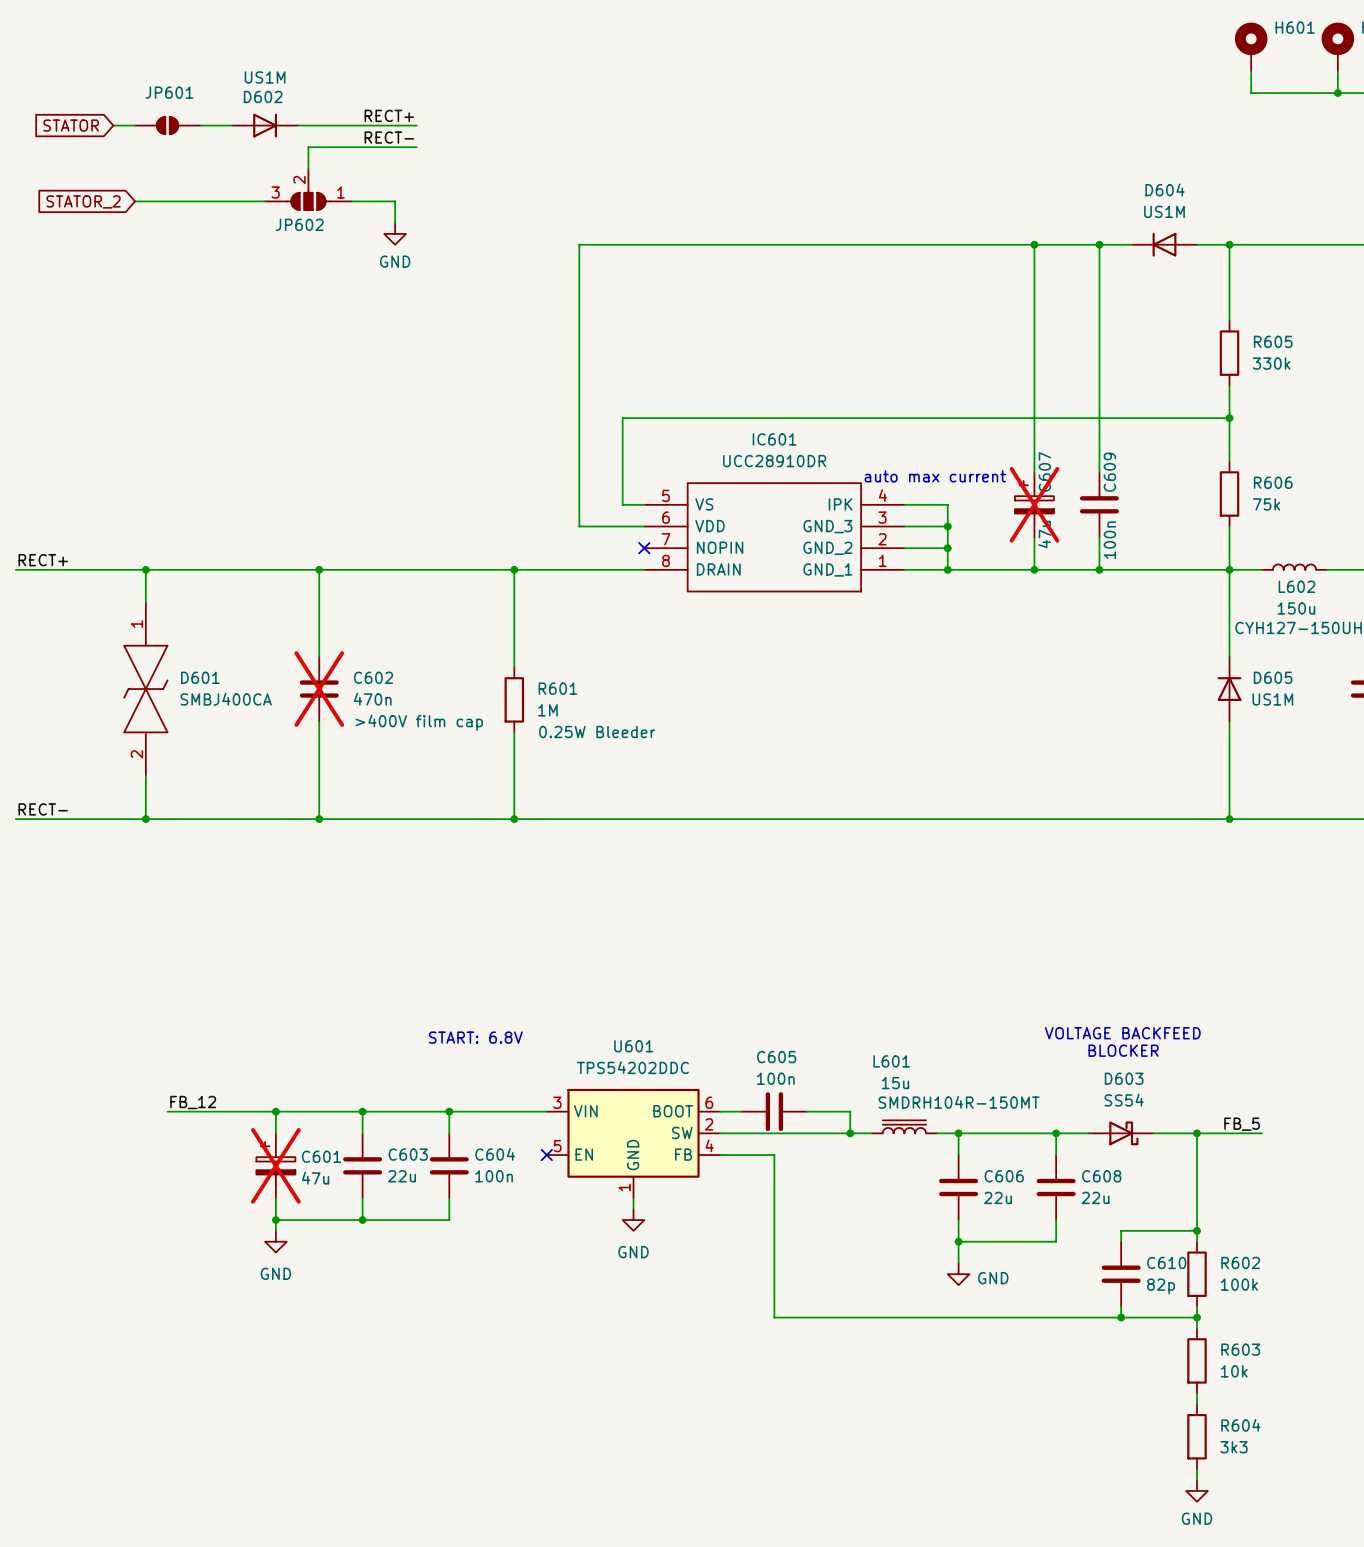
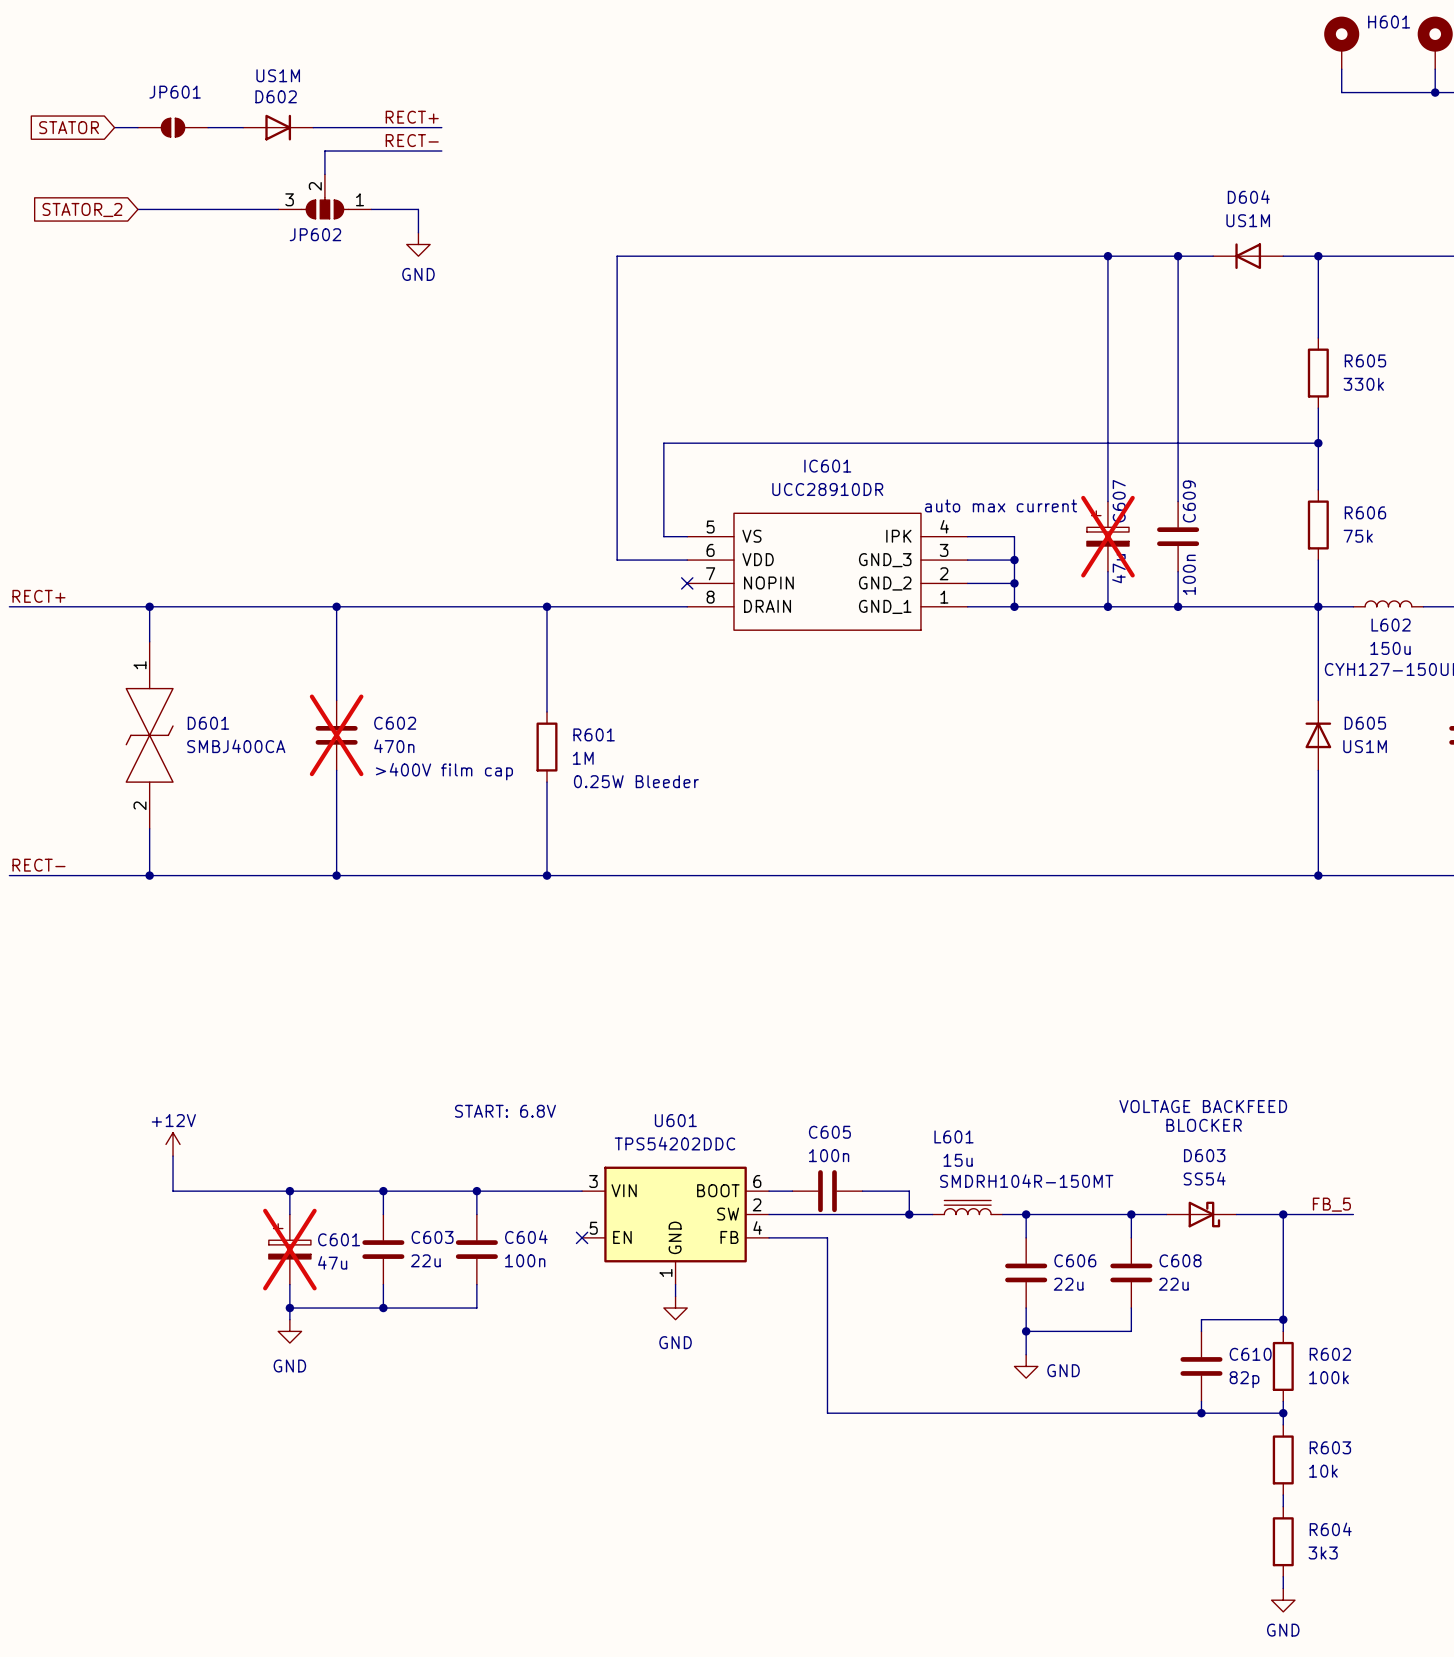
power symbol: none -> +12V (173, 1144)
wire: none -> (173, 1156) (173, 1191)
label: FB_12 (193, 1102) -> none

